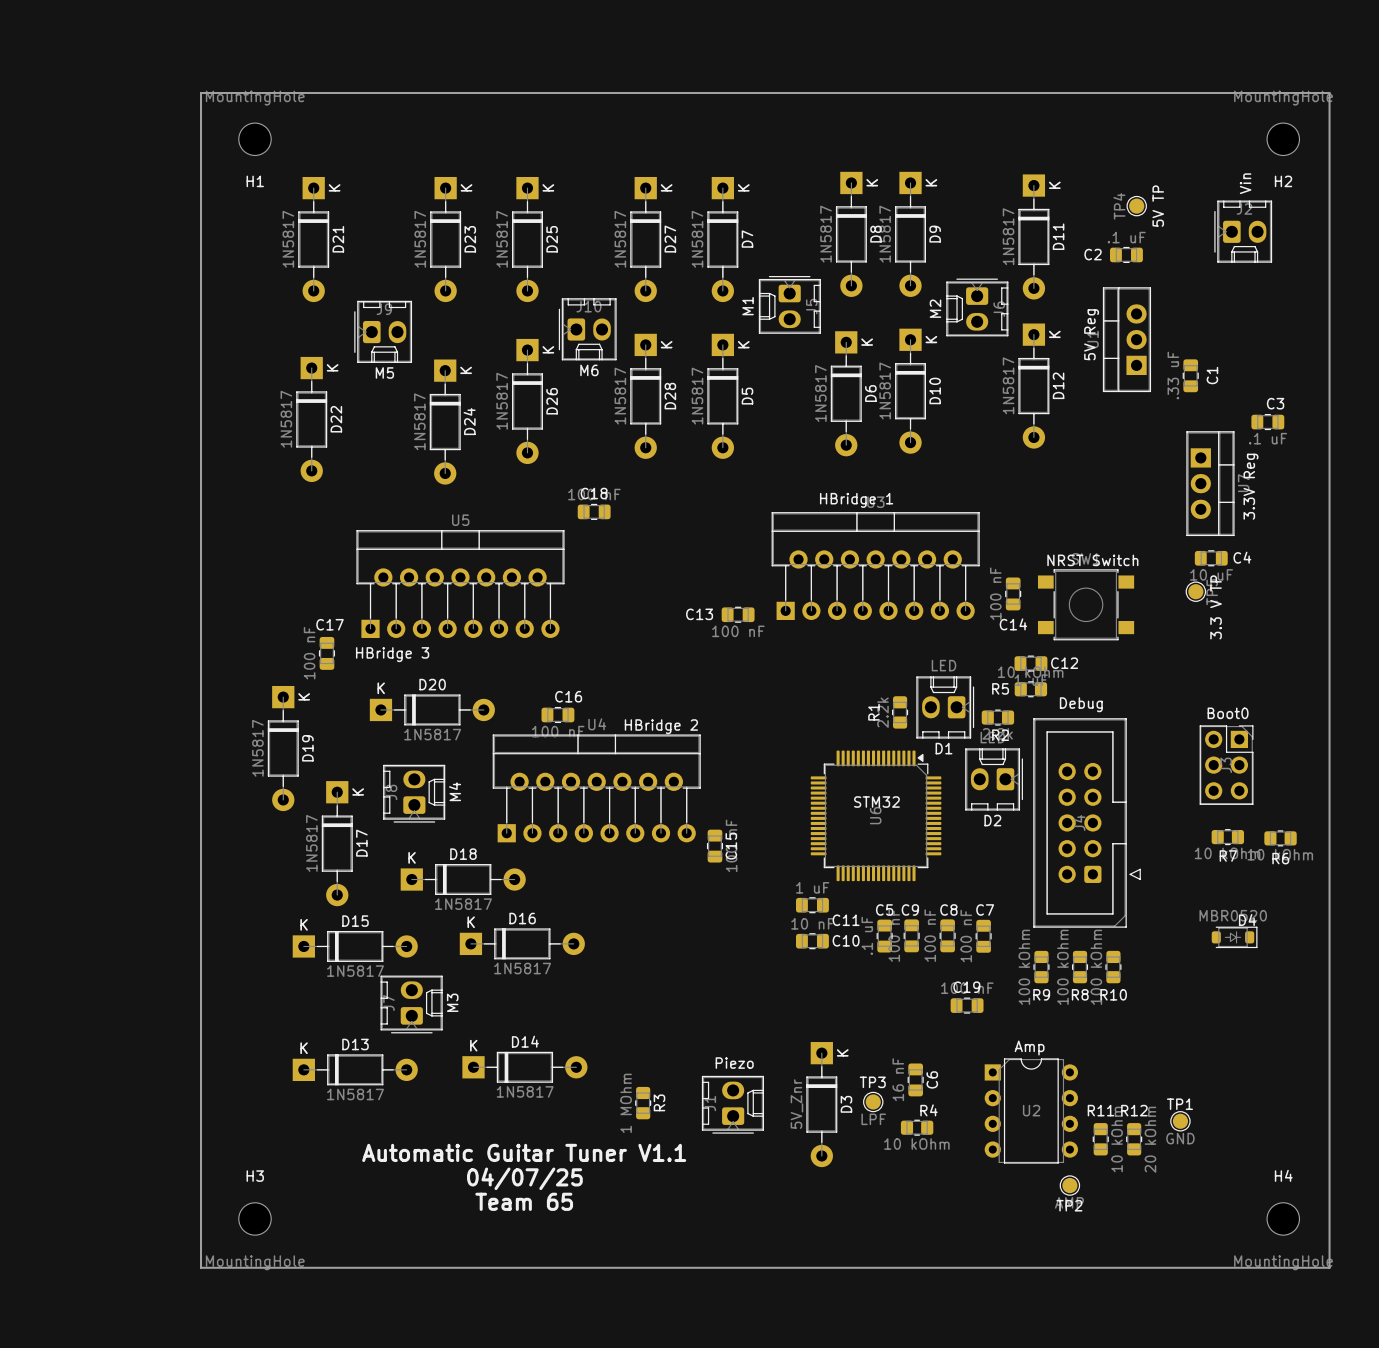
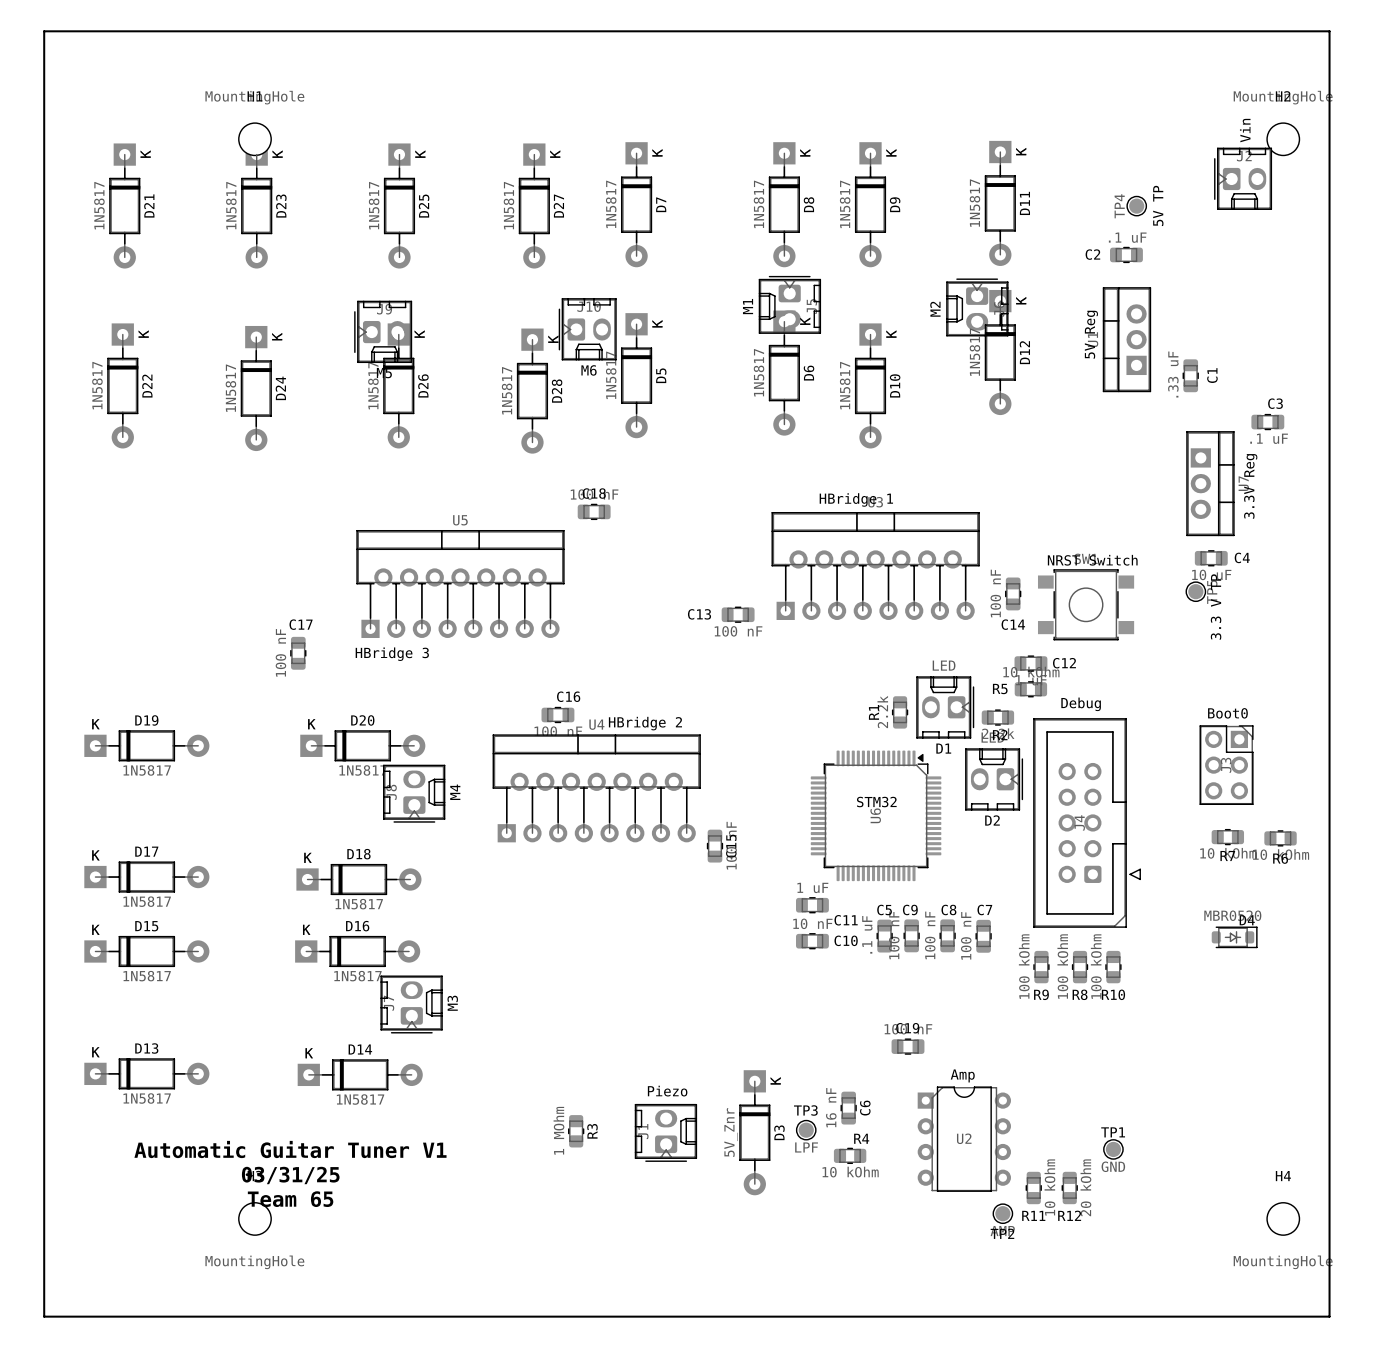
board edge: (1329, 93) (201, 93) (201, 1267) (1329, 1267) -> (1329, 93) (1329, 31) (44, 31) (44, 1316) (1329, 1316) (1329, 1267)
H1 name position: H1 (255, 181) -> H1 (254, 96)
H2 name position: H2 (1283, 181) -> H2 (1283, 96)
J2 position: (1243, 231) -> (1243, 178)
D8 position: (851, 234) -> (784, 204)
D9 position: (910, 234) -> (870, 204)
D11 position: (1033, 236) -> (1000, 203)
D21 position: (313, 239) -> (124, 205)
D23 position: (445, 239) -> (256, 205)
D25 position: (527, 239) -> (399, 205)
D27 position: (645, 239) -> (534, 205)
D7 position: (722, 239) -> (636, 204)
D12 position: (1033, 386) -> (1000, 352)
D10 position: (910, 391) -> (870, 385)
D6 position: (846, 393) -> (784, 373)
D28 position: (645, 396) -> (532, 391)
D5 position: (722, 396) -> (636, 375)
D26 position: (527, 401) -> (398, 385)
D22 position: (311, 419) -> (122, 385)
D24 position: (445, 422) -> (256, 388)
C17 position: (326, 653) -> (298, 653)
D20 position: (432, 709) -> (362, 745)
U4 text position: HBridge 2 (661, 726) -> HBridge 2 (645, 723)
D19 rotation: 0° (283, 748) -> 90° counterclockwise (146, 745)
D19 position: (283, 748) -> (146, 745)
D17 rotation: 0° (337, 843) -> 90° counterclockwise (146, 877)
D17 position: (337, 843) -> (146, 877)
D18 position: (463, 879) -> (358, 879)
D16 position: (522, 943) -> (357, 951)
D15 position: (355, 946) -> (146, 951)
C19 position: (967, 1005) -> (908, 1046)
D13 footprint: [292, 1054, 418, 1086] -> [84, 1058, 210, 1090]
D14 position: (524, 1067) -> (360, 1074)
C6 position: (915, 1079) -> (848, 1108)
TP3 position: (873, 1101) -> (806, 1130)
R3 position: (643, 1103) -> (576, 1131)
J1 position: (732, 1104) -> (665, 1132)
D3 position: (821, 1104) -> (754, 1132)
U2 position: (1031, 1110) -> (964, 1139)
R11 name position: R11 (1100, 1110) -> R11 (1033, 1215)
R12 name position: R12 (1134, 1110) -> R12 (1069, 1215)
TP1 position: (1180, 1121) -> (1113, 1149)
R4 position: (917, 1127) -> (850, 1155)
R11 position: (1100, 1139) -> (1033, 1187)
R12 position: (1134, 1139) -> (1069, 1187)
text: Automatic Guitar Tuner V1.1 (524, 1152) -> Automatic Guitar Tuner V1 (290, 1149)
text: none -> 03/31/25 (290, 1175)
text: 04/07/25 (524, 1178) -> none
TP2 position: (1069, 1185) -> (1002, 1213)
text position: Team 65 (524, 1201) -> Team 65 (290, 1199)

